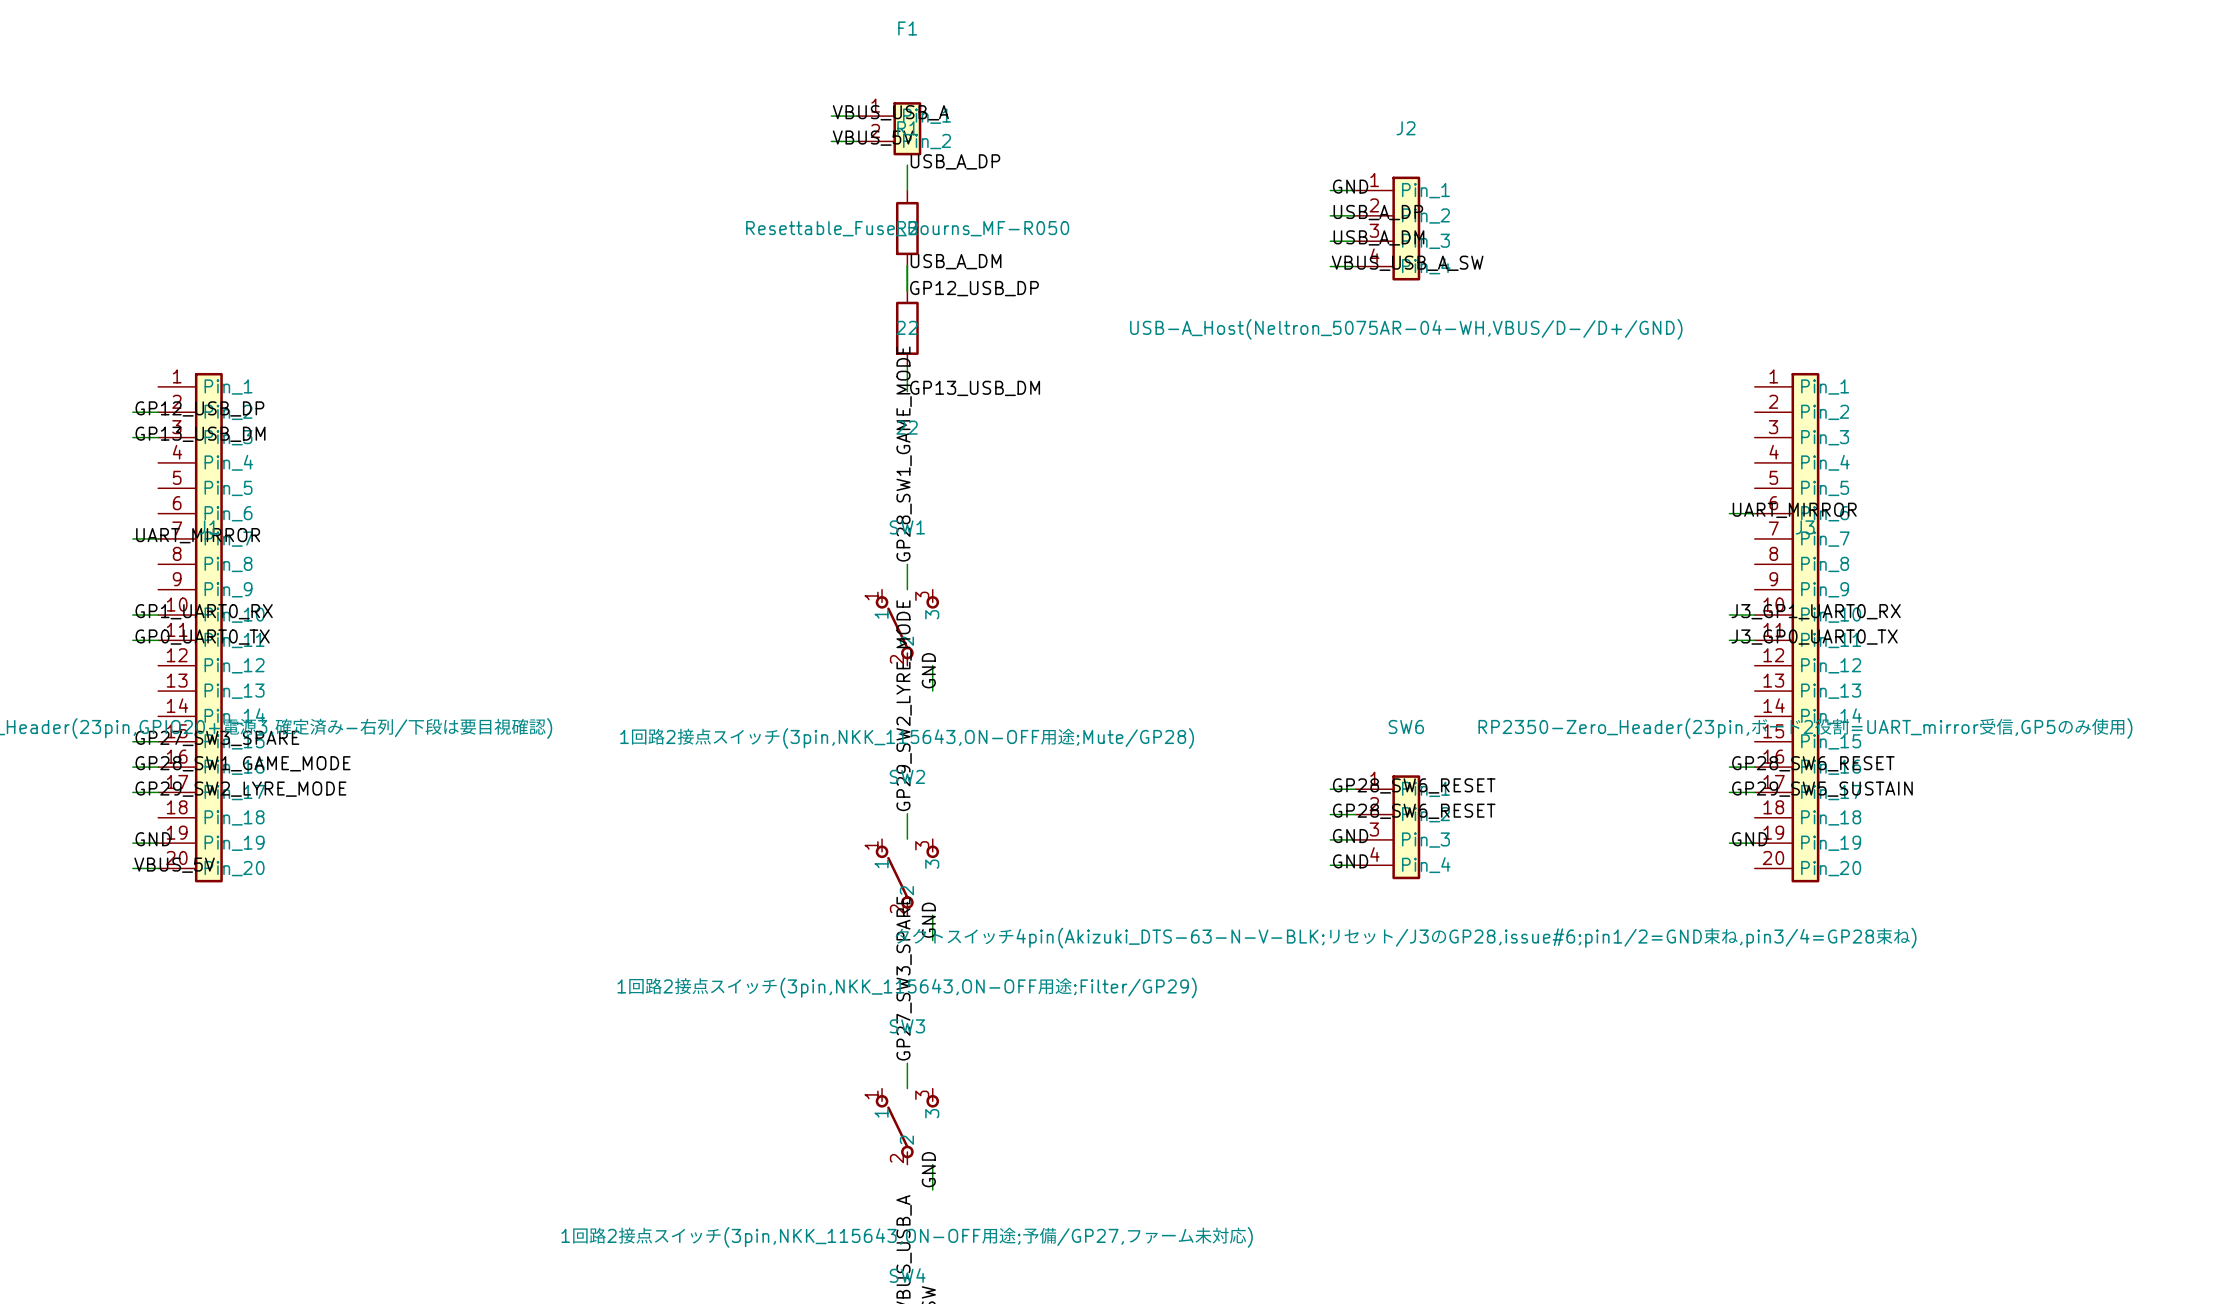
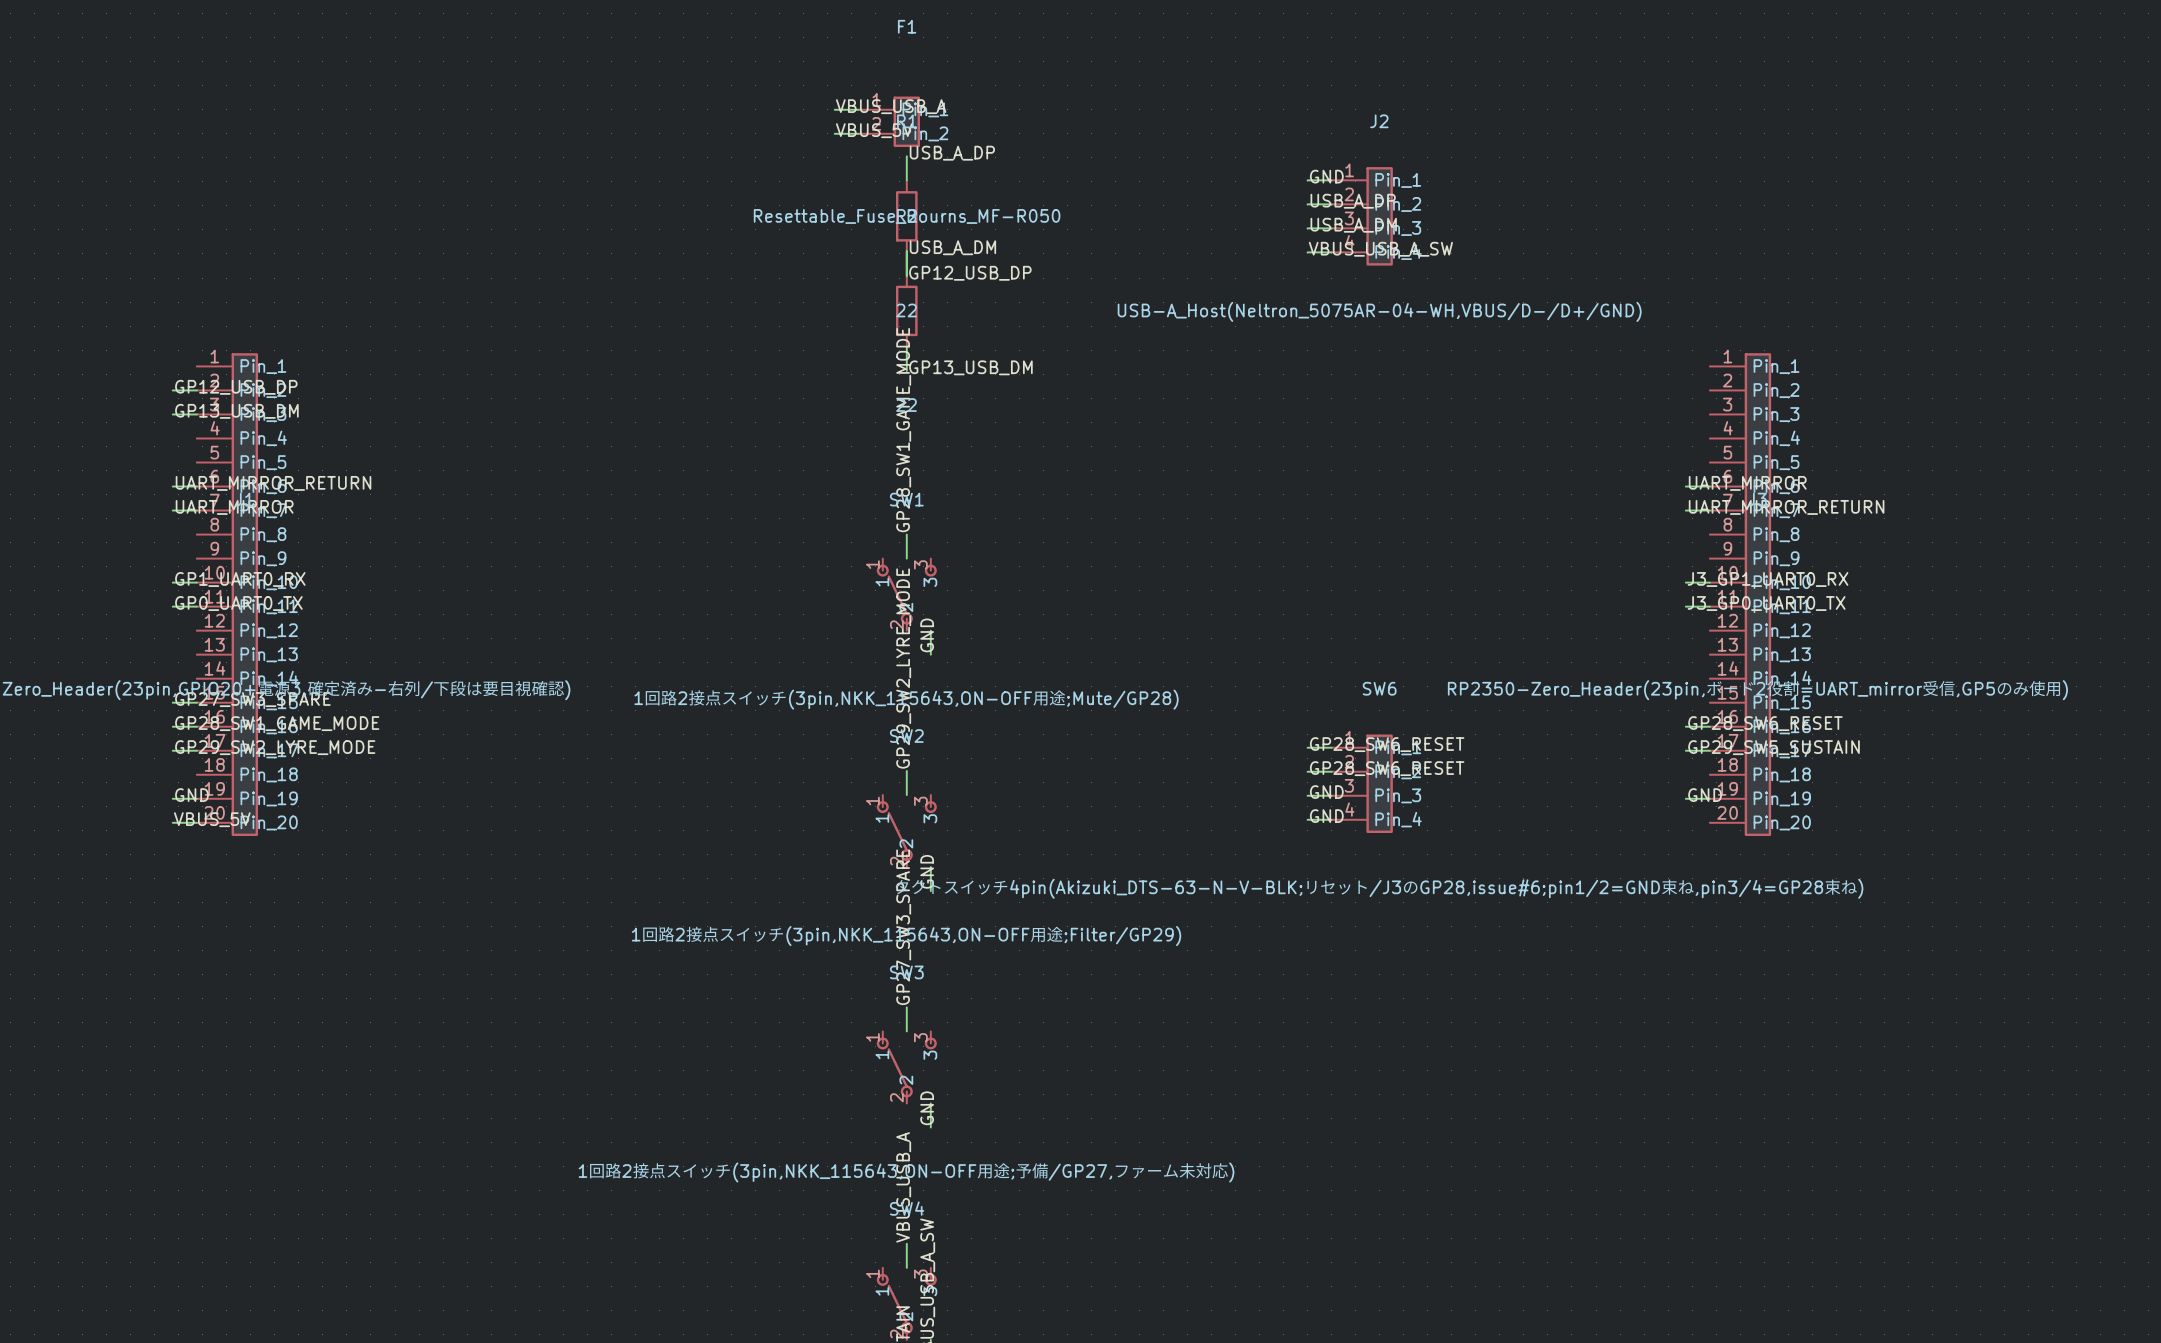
label: none -> UART_MIRROR_RETURN (273, 483)
wire: none -> (172, 486) (196, 486)
label: none -> UART_MIRROR_RETURN (1786, 507)
wire: none -> (1685, 510) (1709, 510)

